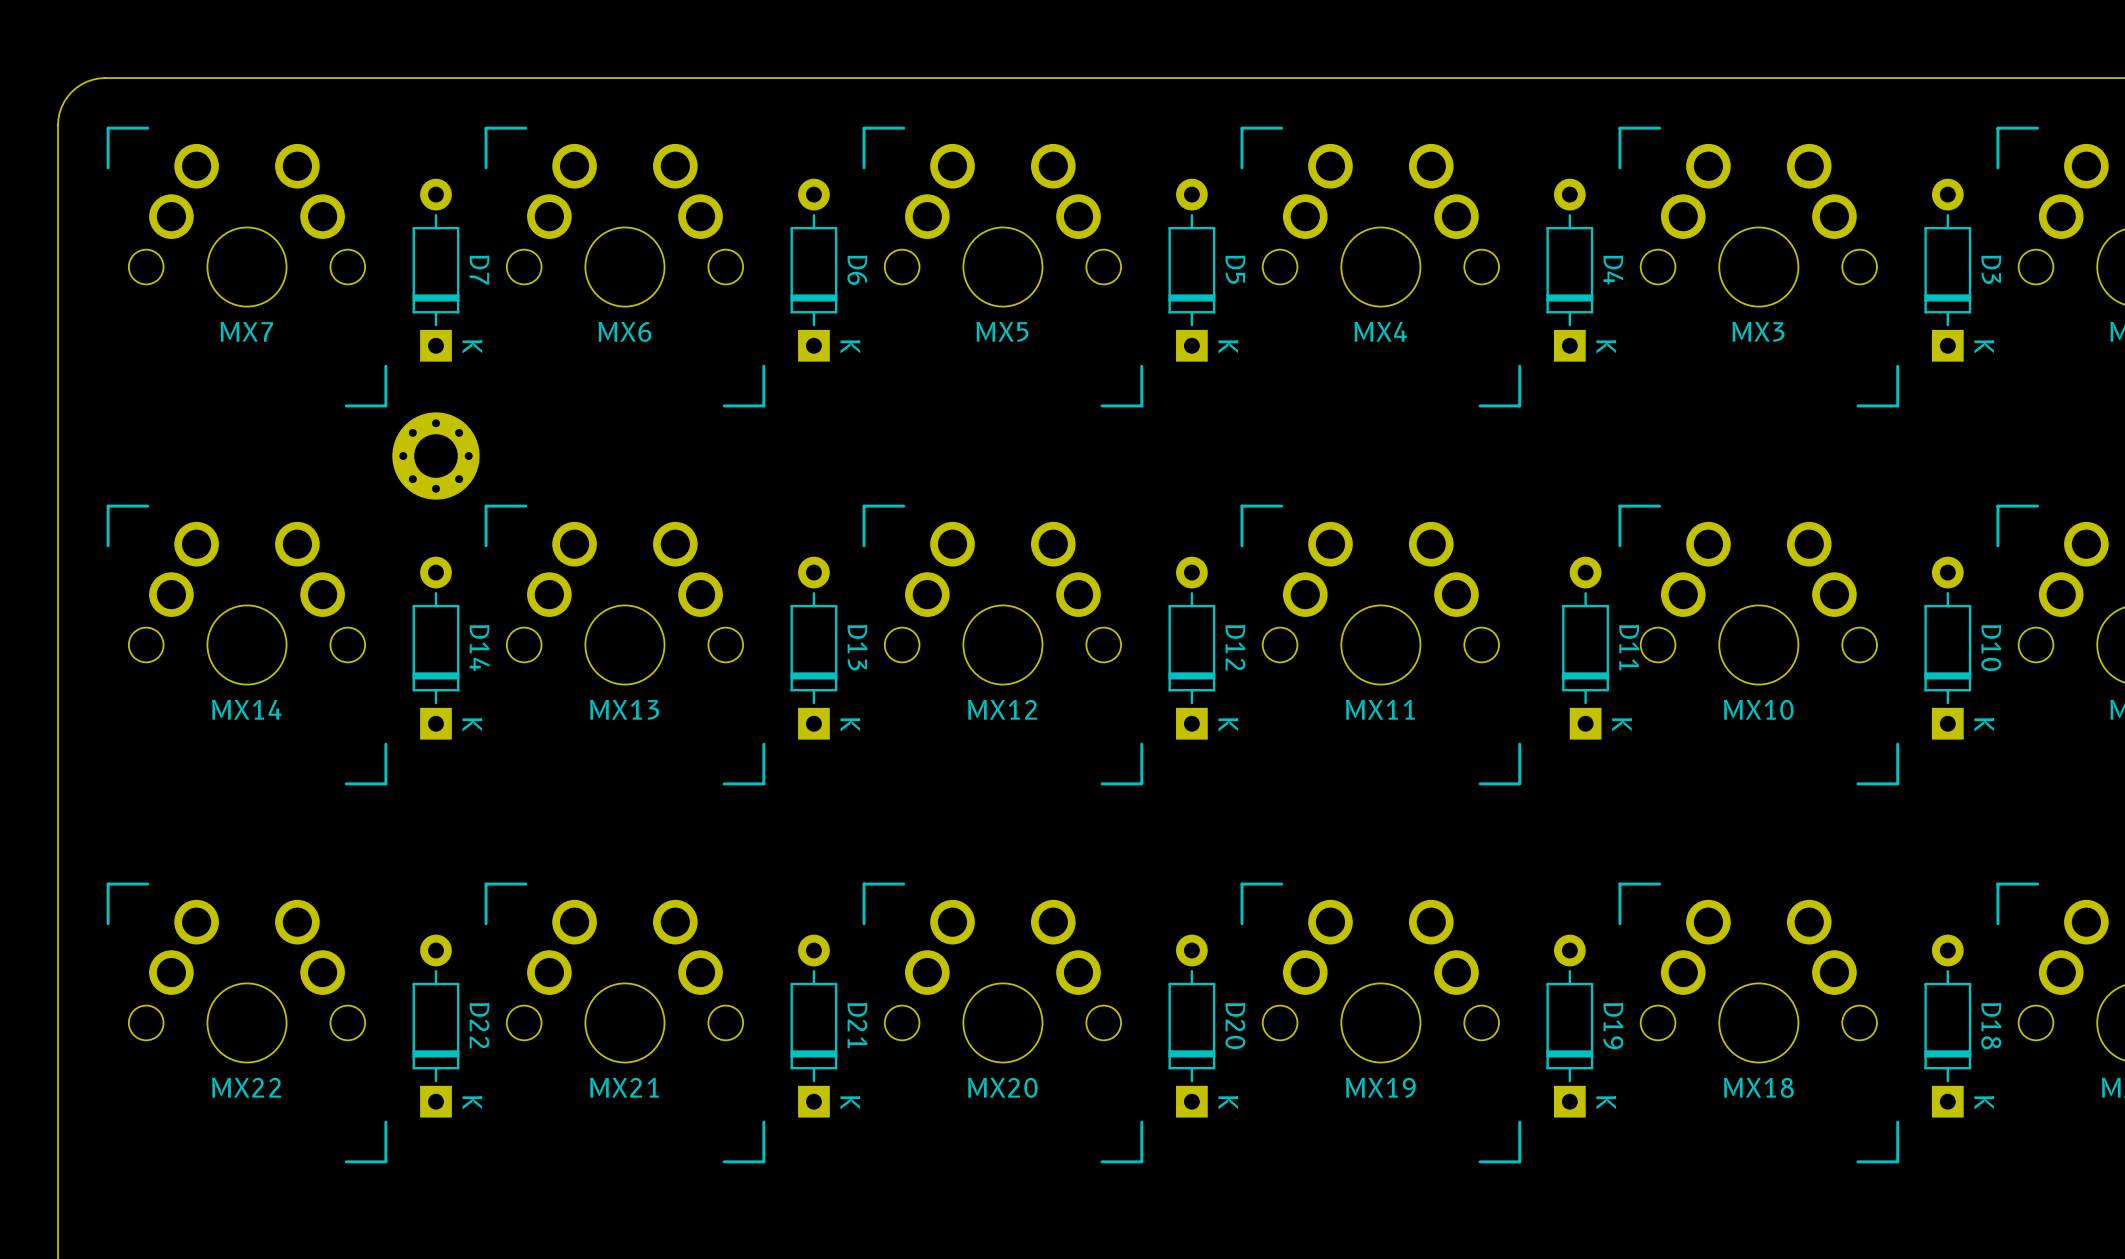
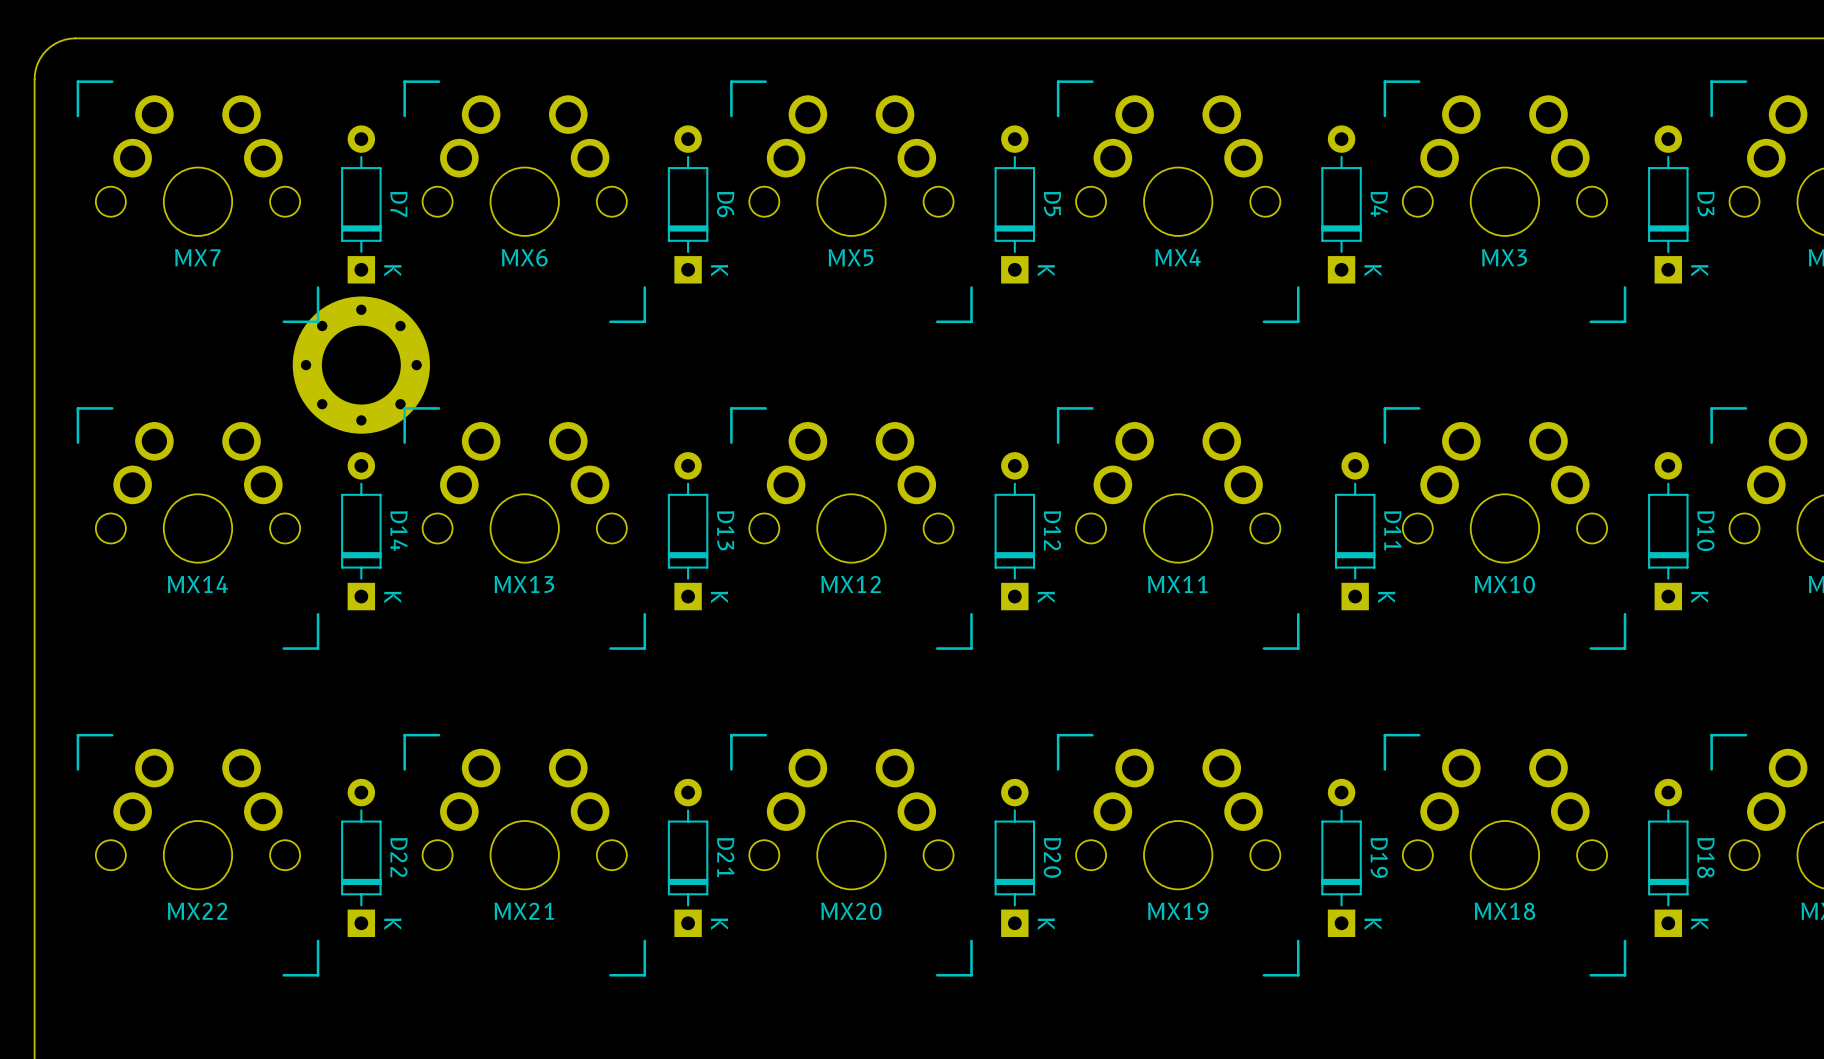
part footprint: [392, 412, 480, 500] -> [292, 296, 430, 434]

